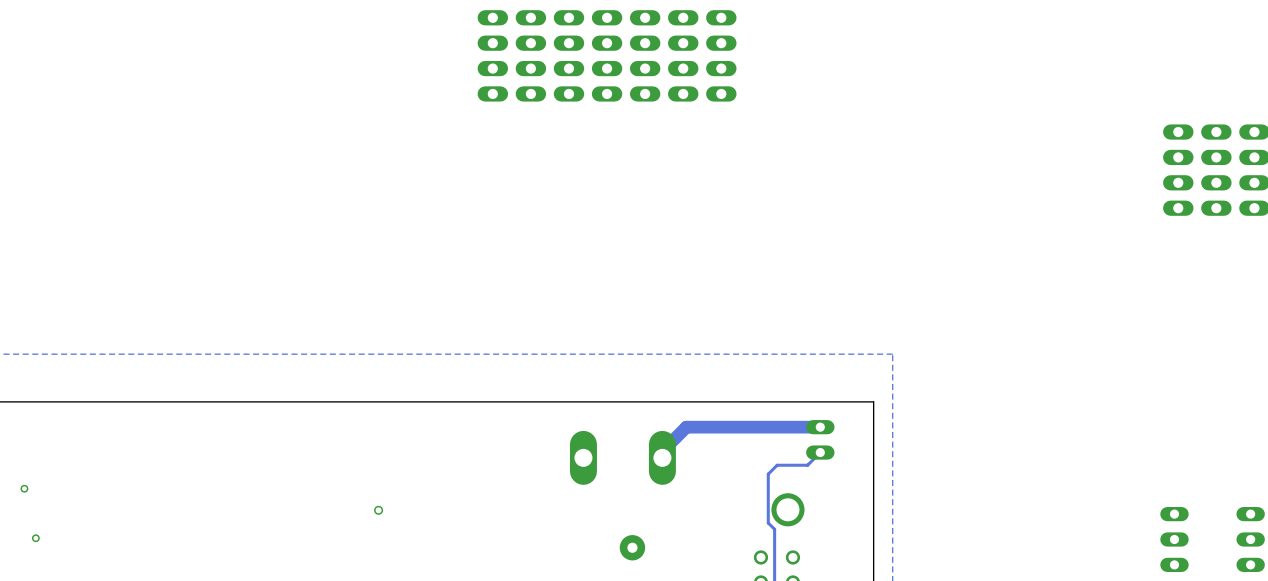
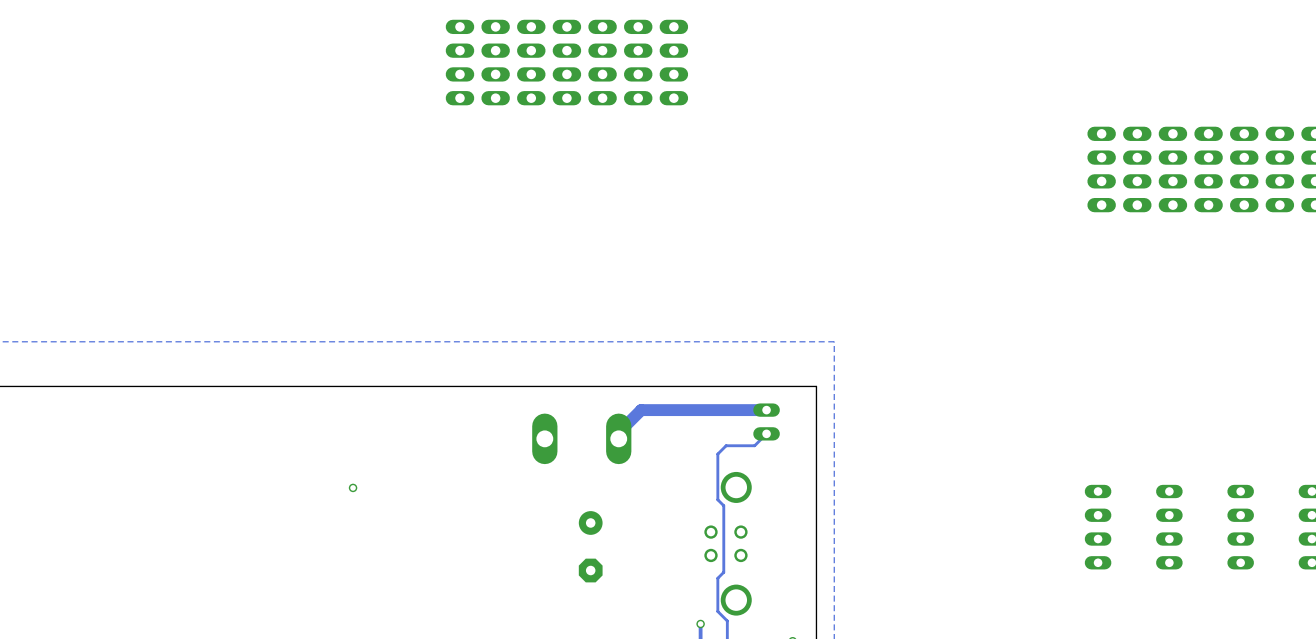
via: (24, 488) -> none
via: (35, 538) -> none

